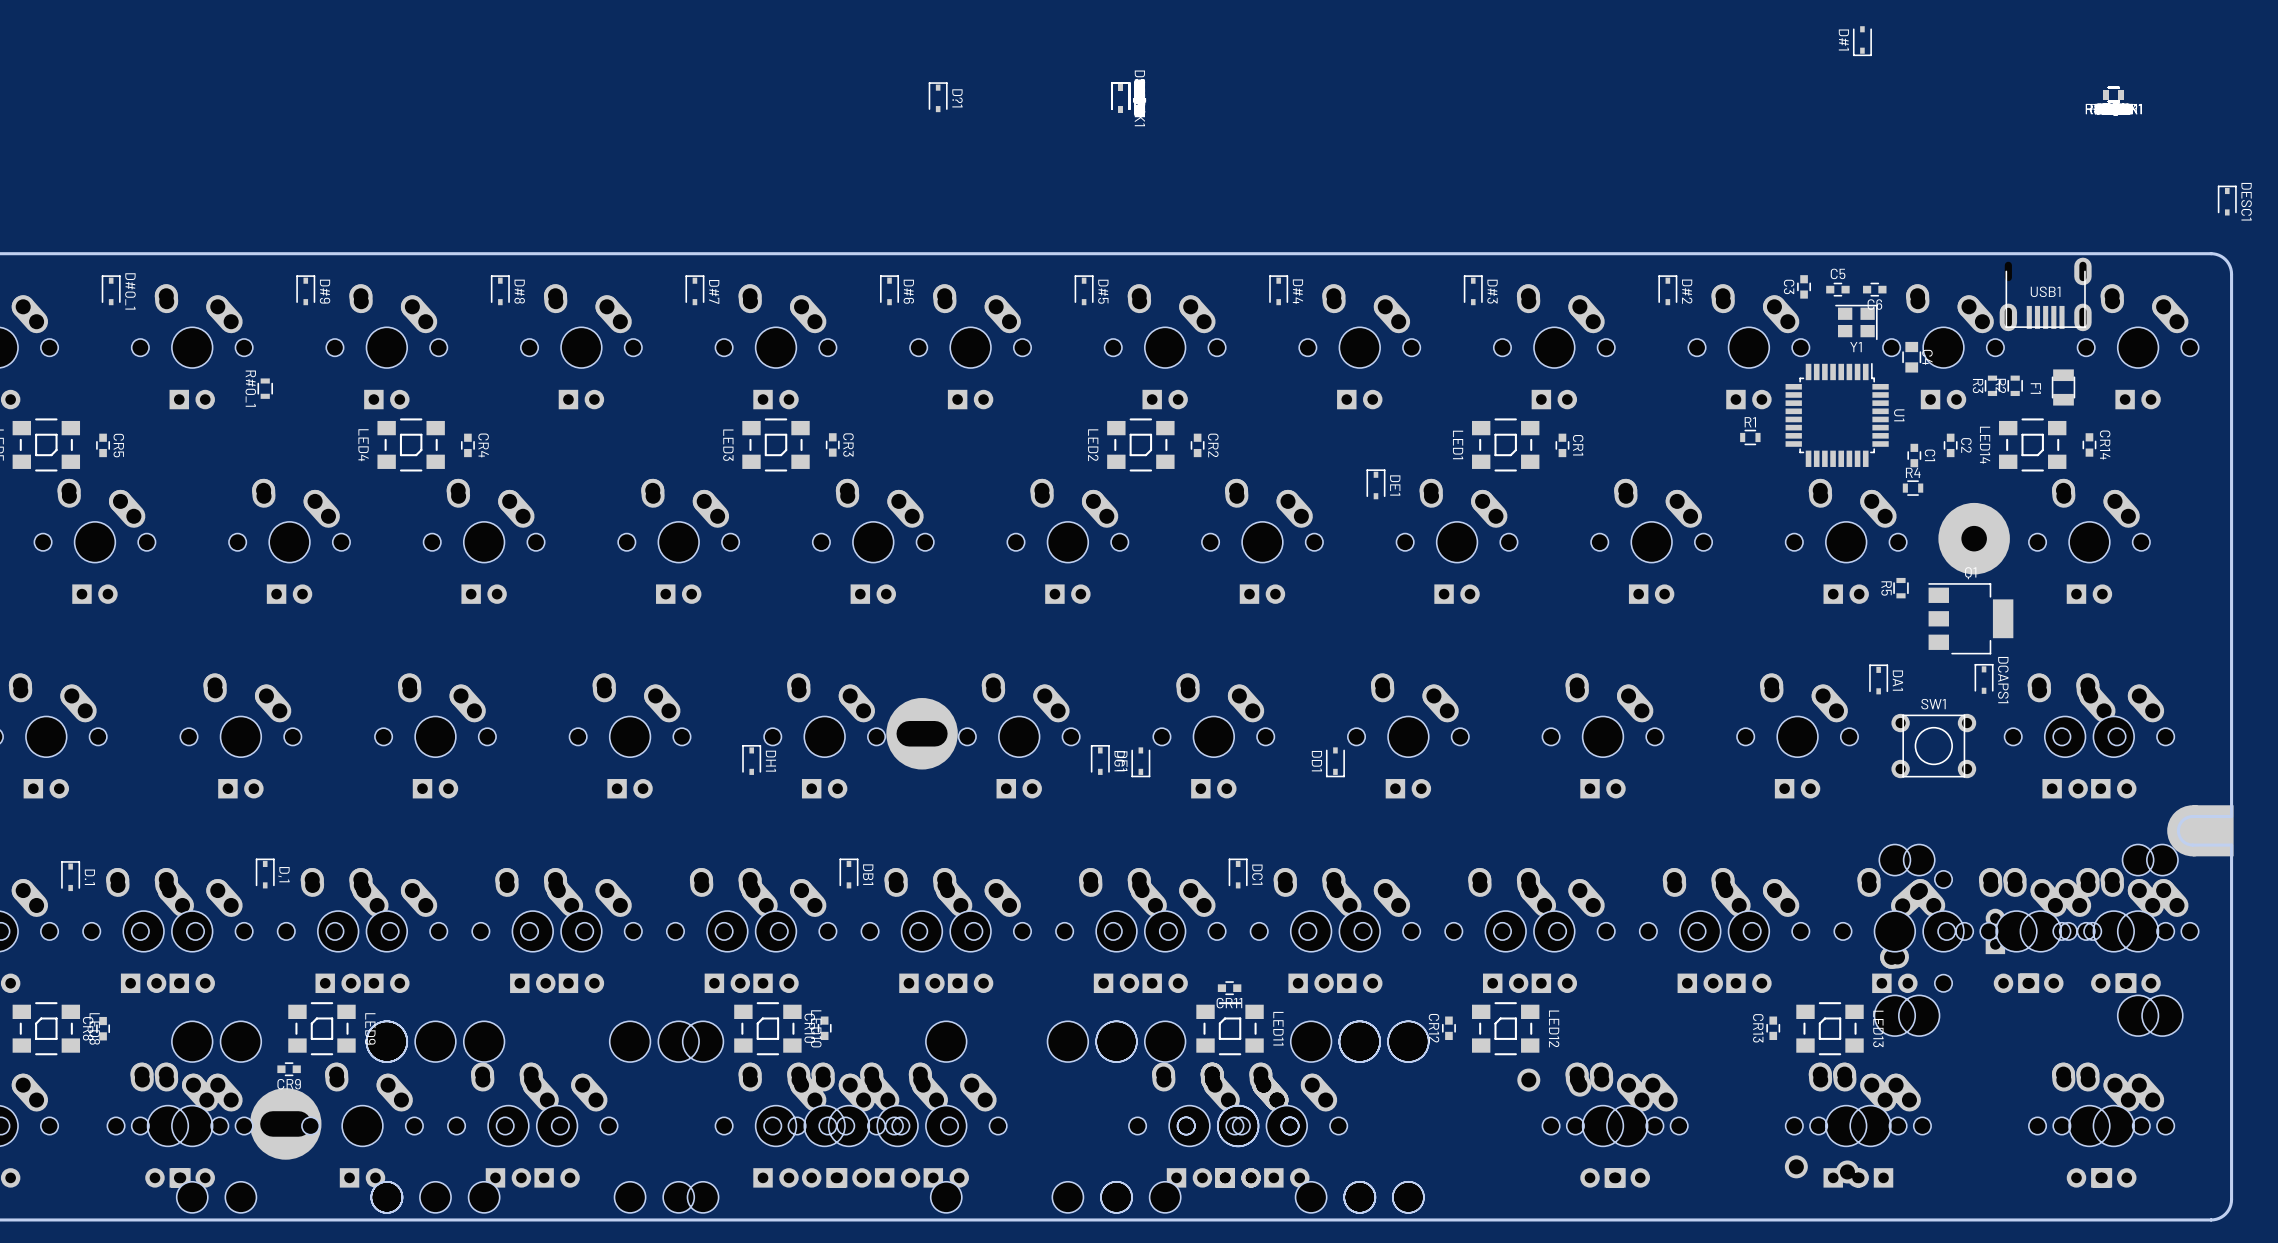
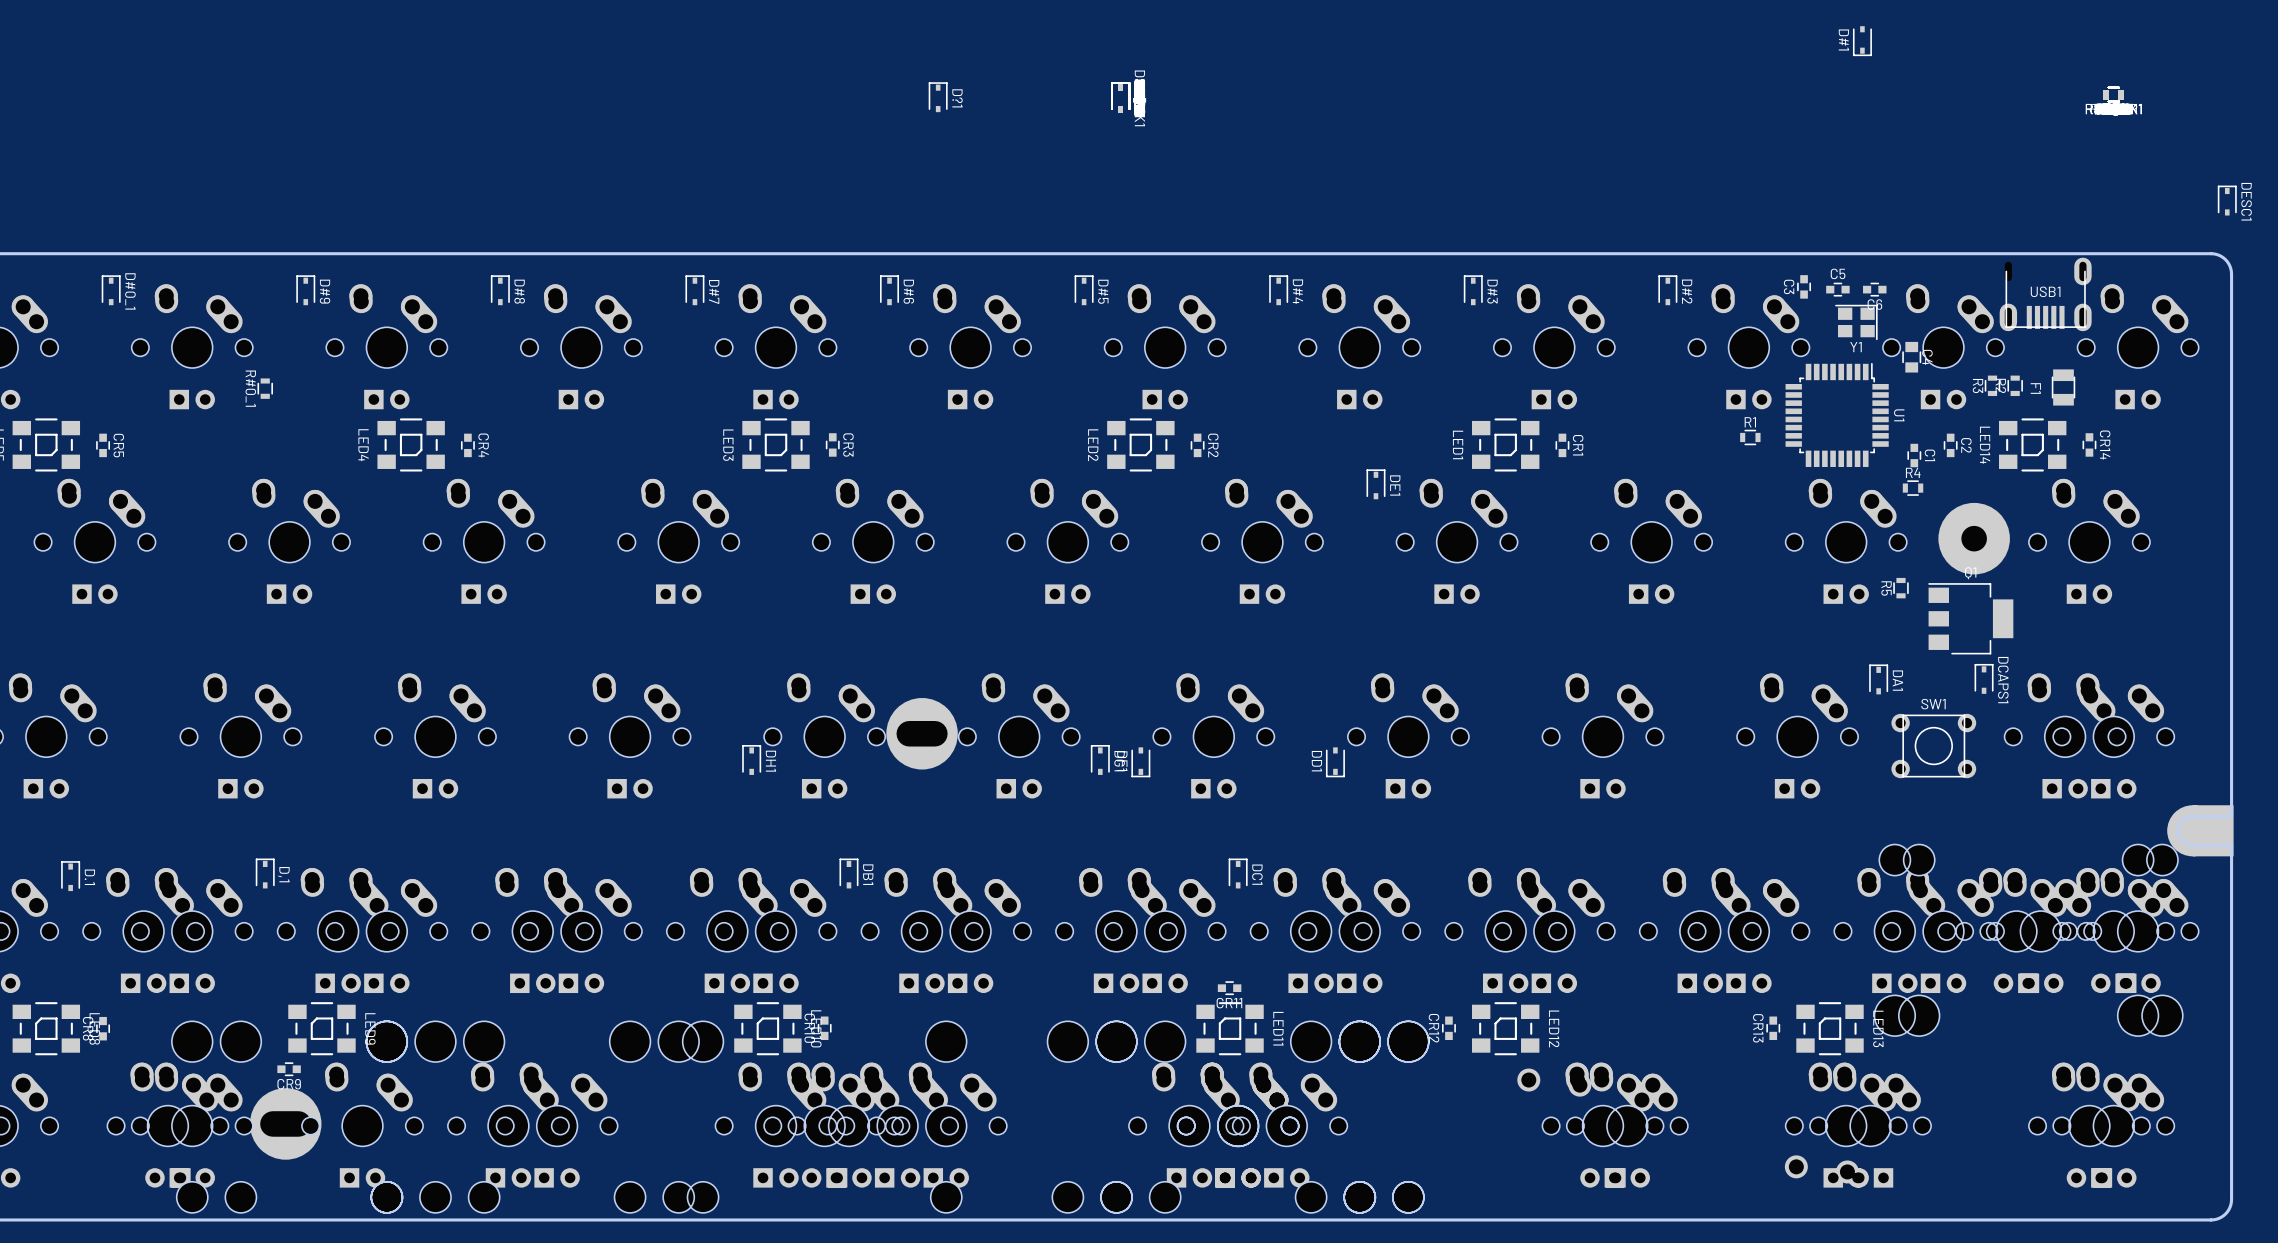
part rotation: 0° (1942, 931) -> 90° clockwise (1943, 930)

